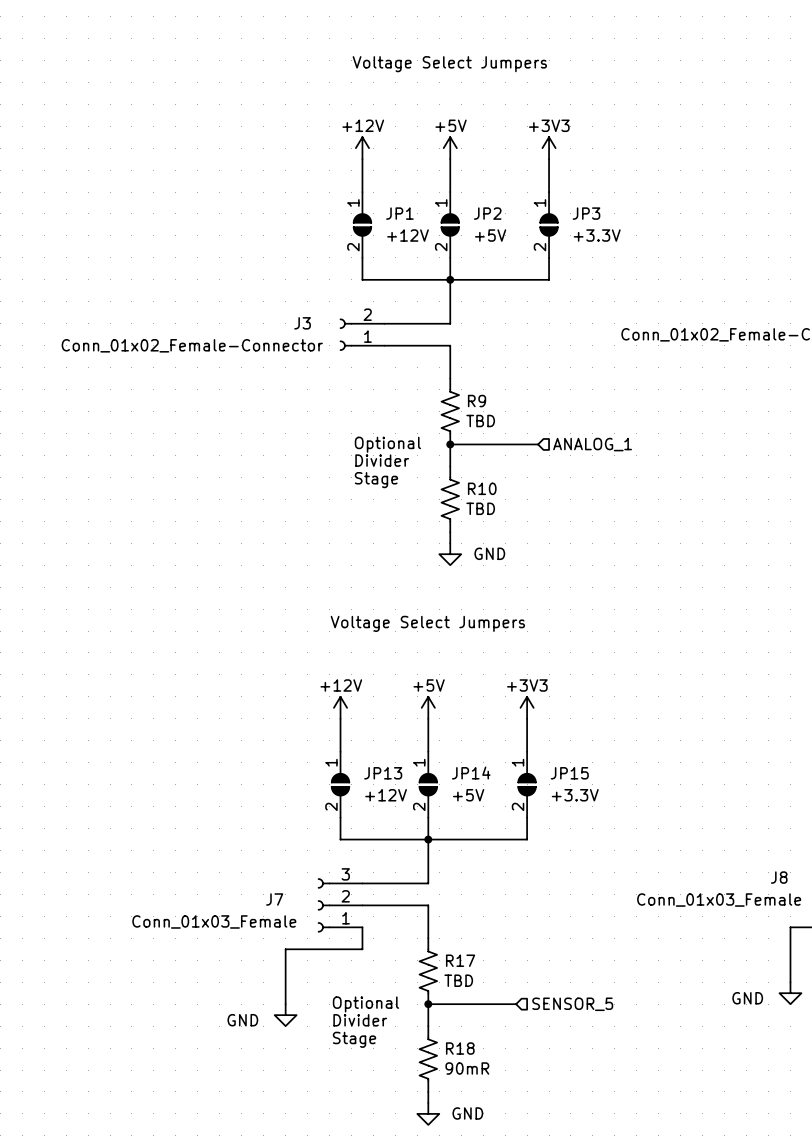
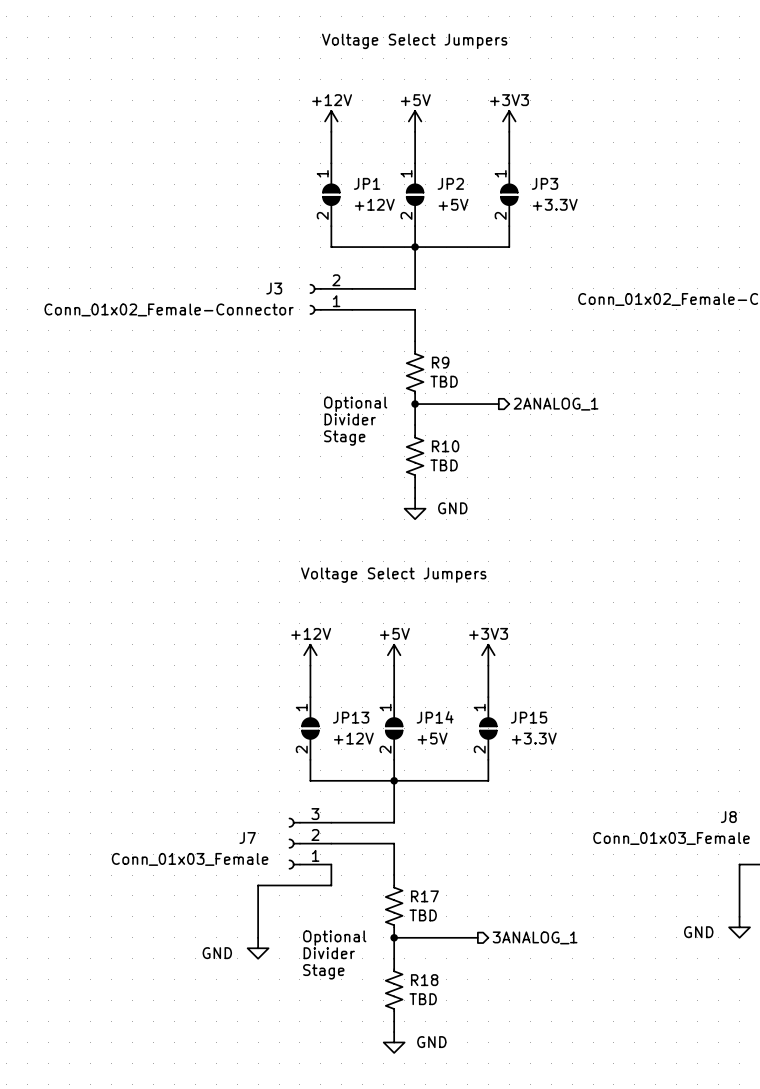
hierarchical label shape: input (592, 444) -> output (556, 404)
hierarchical label: ANALOG_1 (592, 444) -> 2ANALOG_1 (556, 404)
hierarchical label shape: input (572, 1004) -> output (535, 937)
hierarchical label: SENSOR_5 (572, 1004) -> 3ANALOG_1 (535, 937)
R18 value: 90mR (467, 1068) -> TBD (423, 999)

